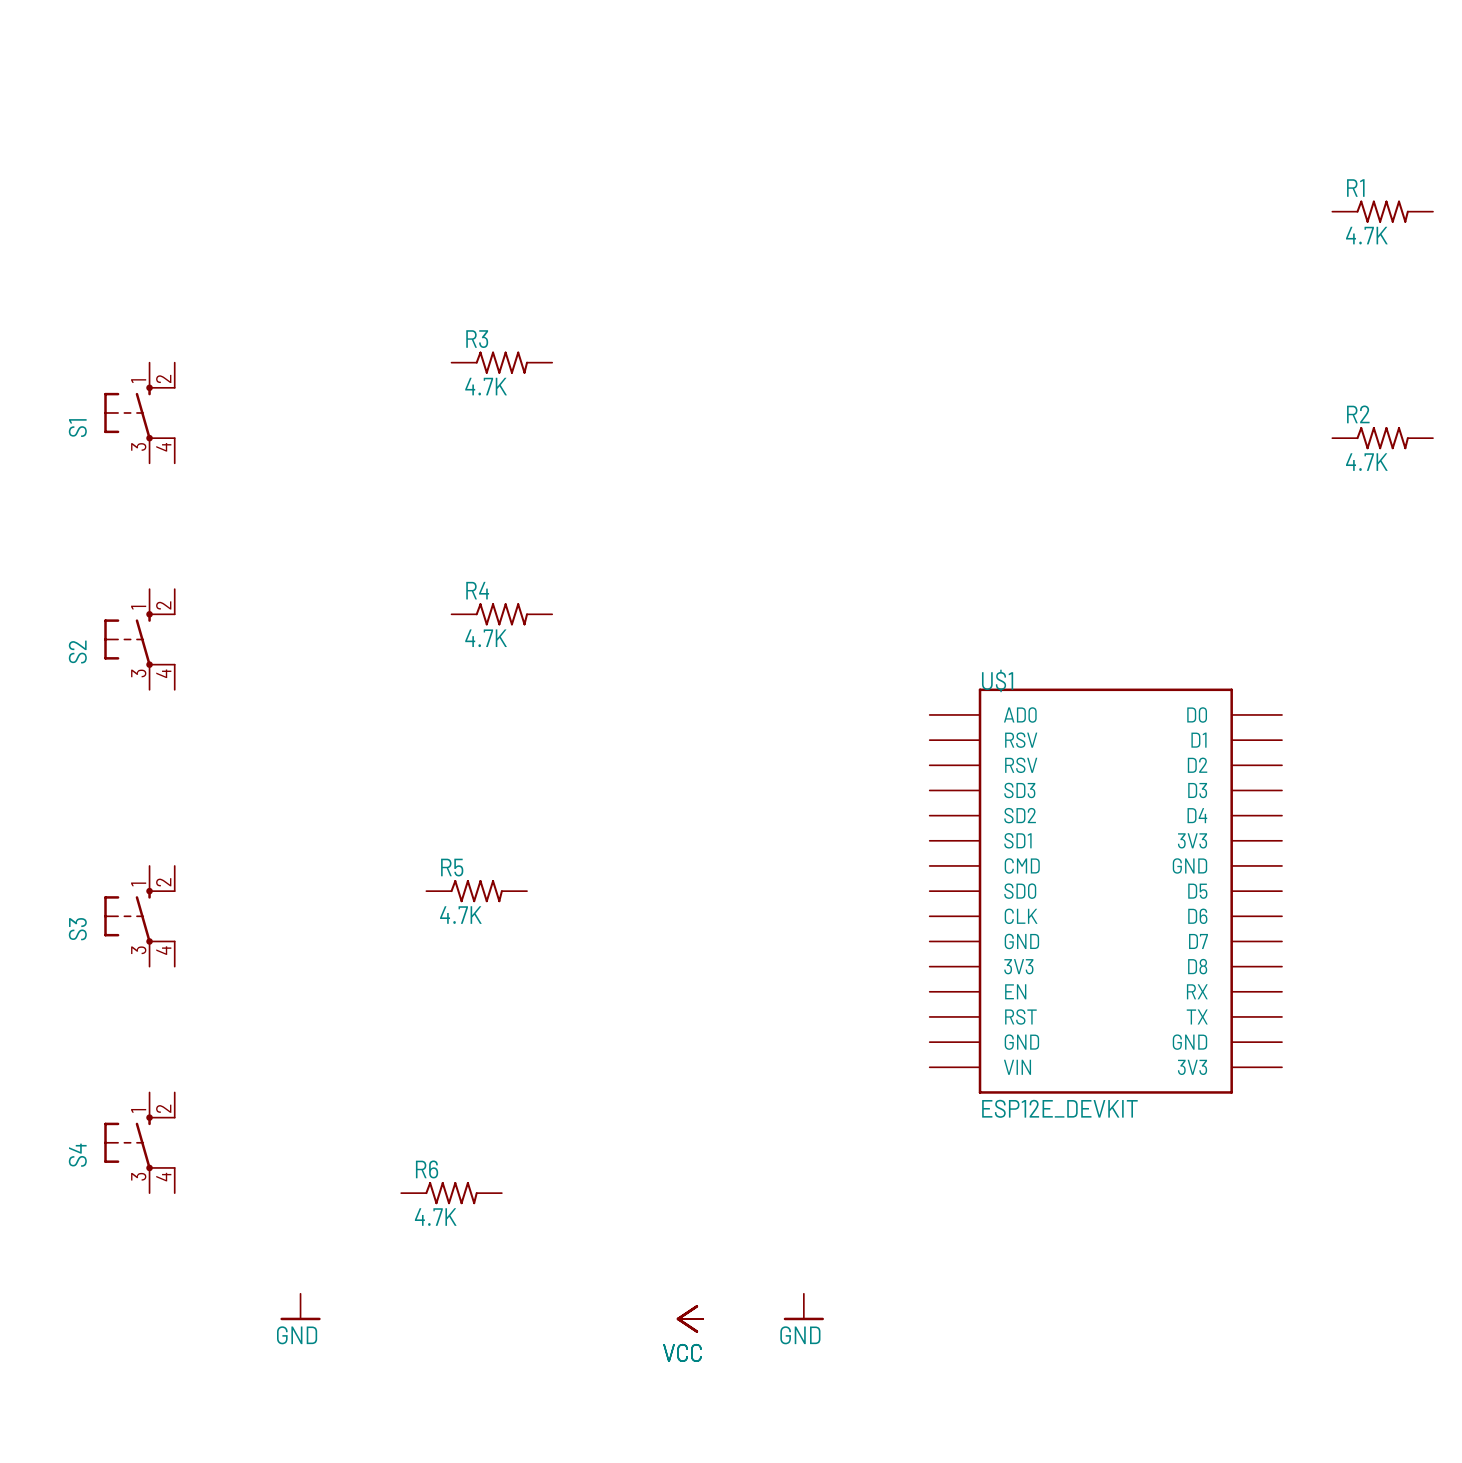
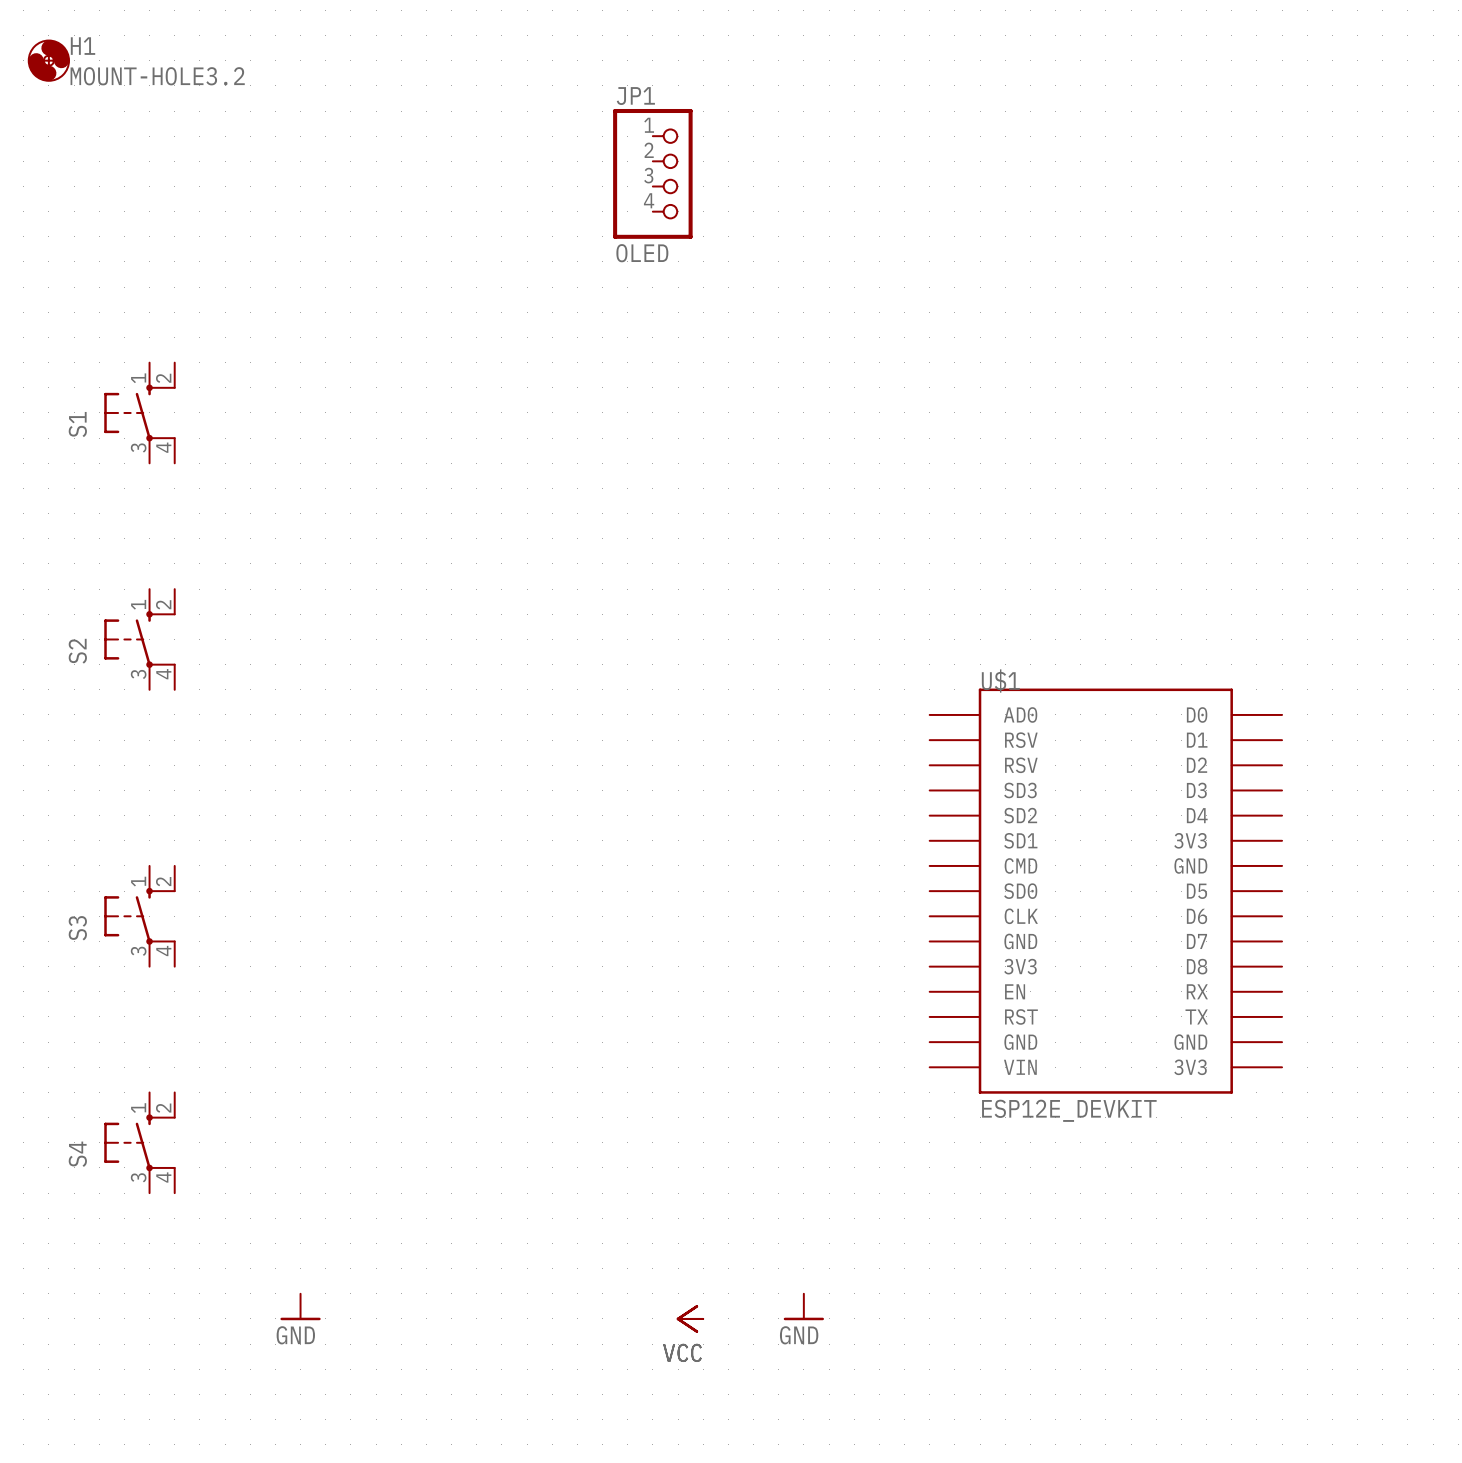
H1: none -> MOUNT-HOLE3.2 (48, 60)
JP1: none -> OLED (652, 173)
R1: 4.7K (1382, 211) -> none
R3: 4.7K (501, 362) -> none
R2: 4.7K (1382, 438) -> none
R4: 4.7K (501, 614) -> none
R5: 4.7K (476, 891) -> none
R6: 4.7K (451, 1193) -> none

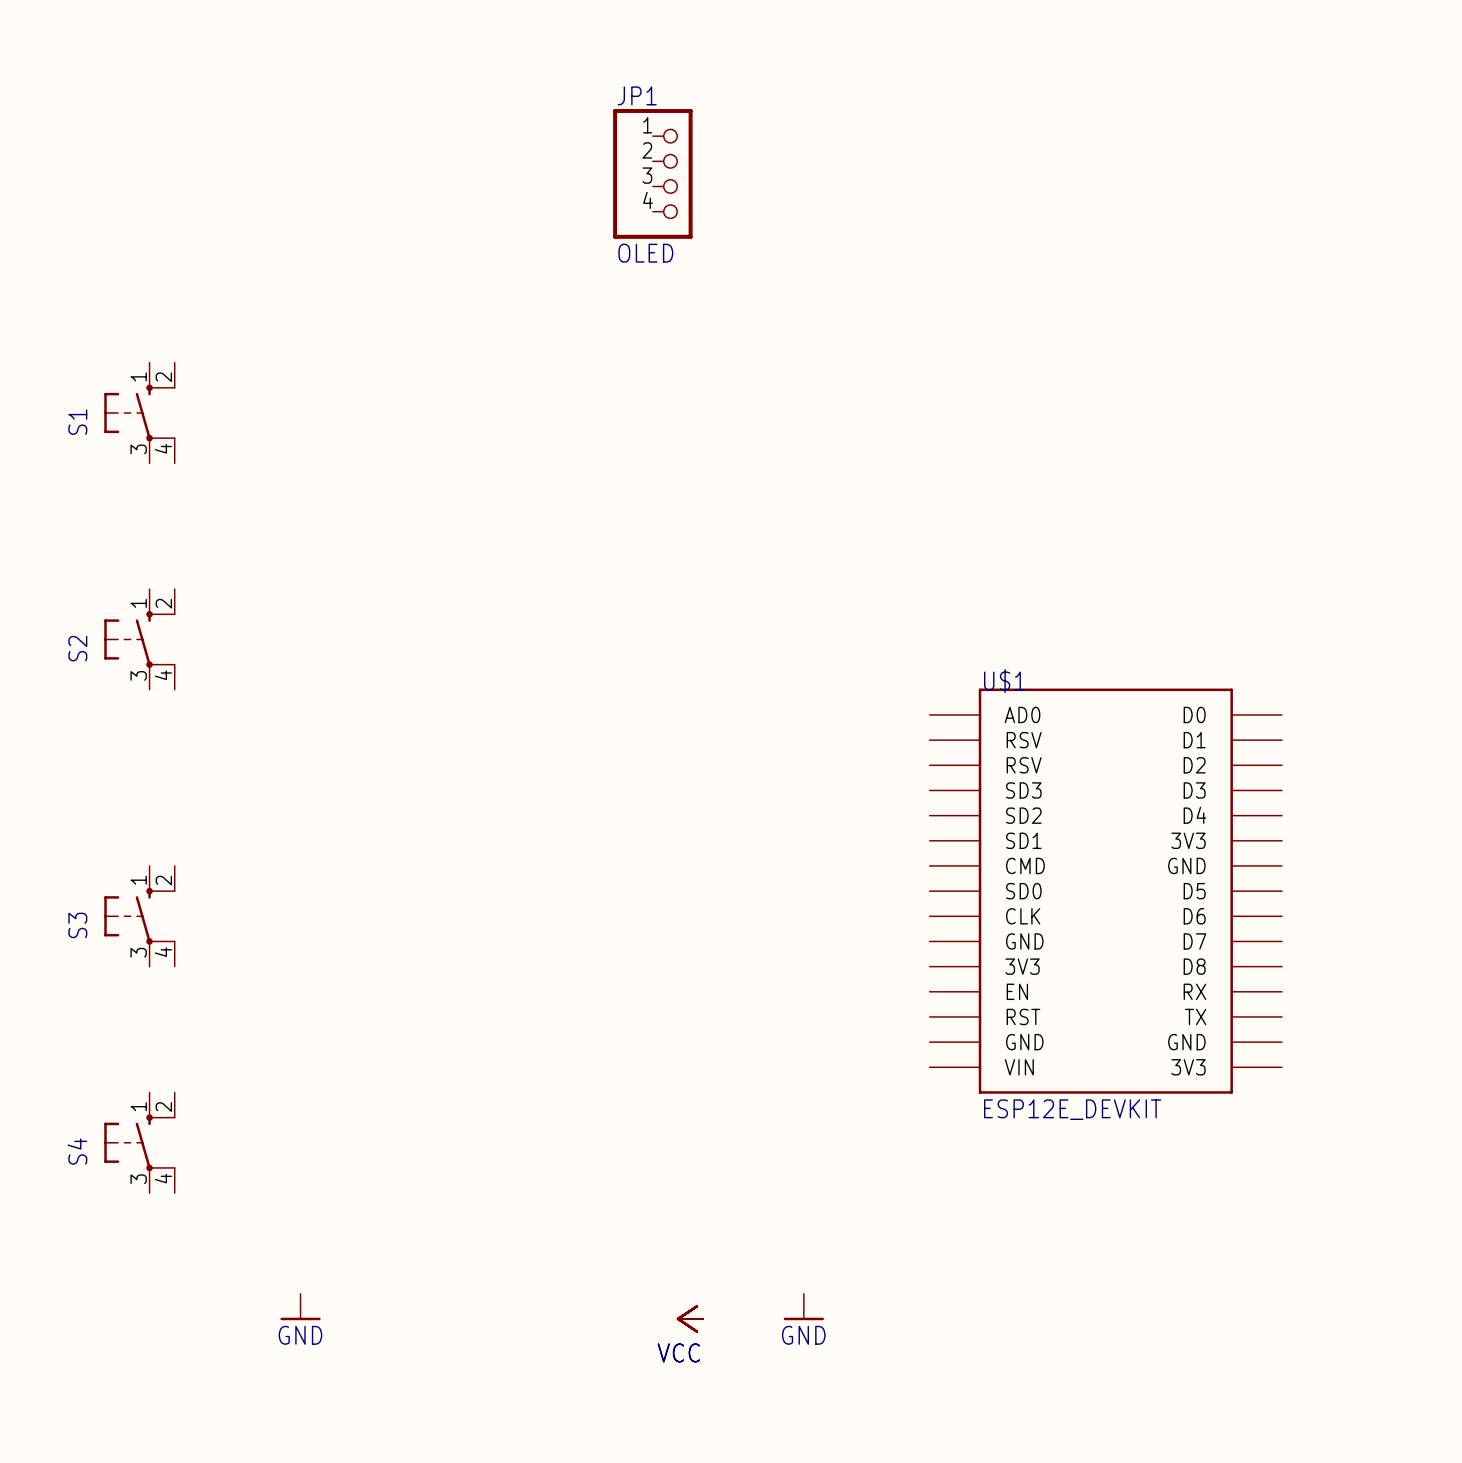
H1: MOUNT-HOLE3.2 (48, 60) -> none

